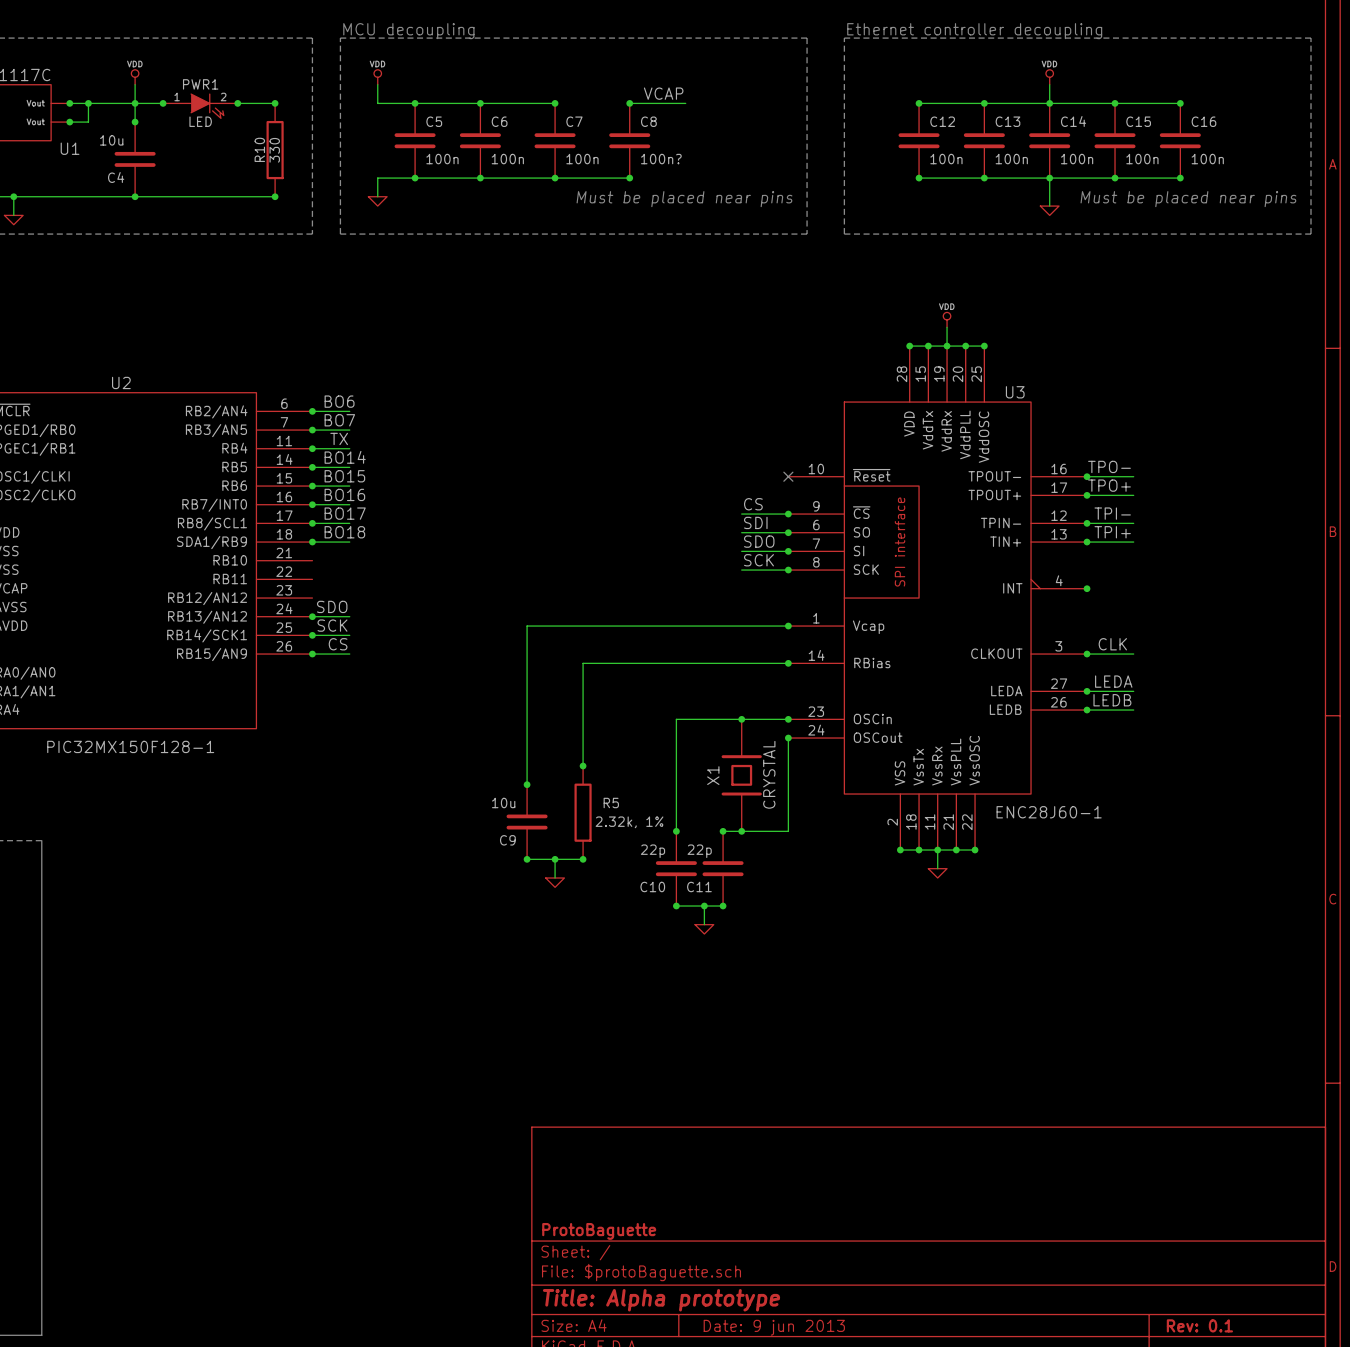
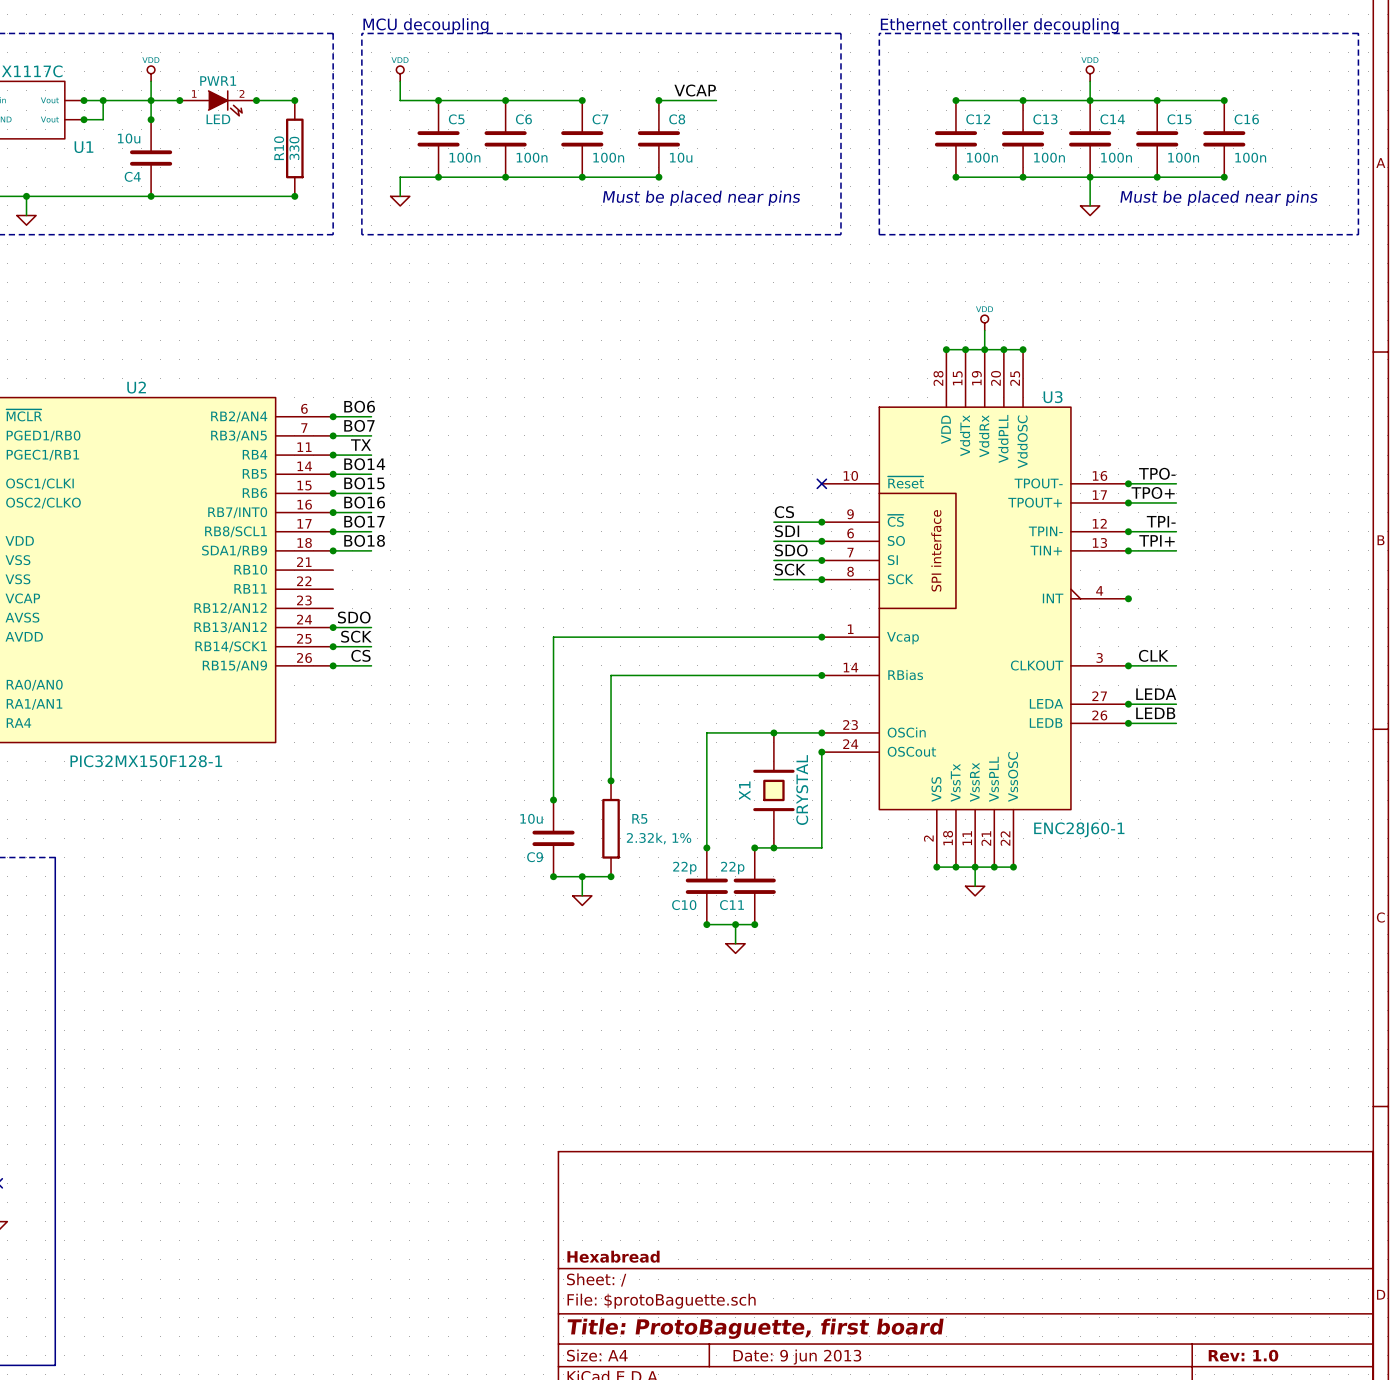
C8 value: 100n? (661, 159) -> 10u (681, 157)
title block: ProtoBaguette (599, 1231) -> Hexabread (613, 1256)
title block: Title: Alpha prototype (661, 1300) -> Title: ProtoBaguette, first board (755, 1328)
title block: Rev: 0.1 (1199, 1325) -> Rev: 1.0 (1243, 1355)

